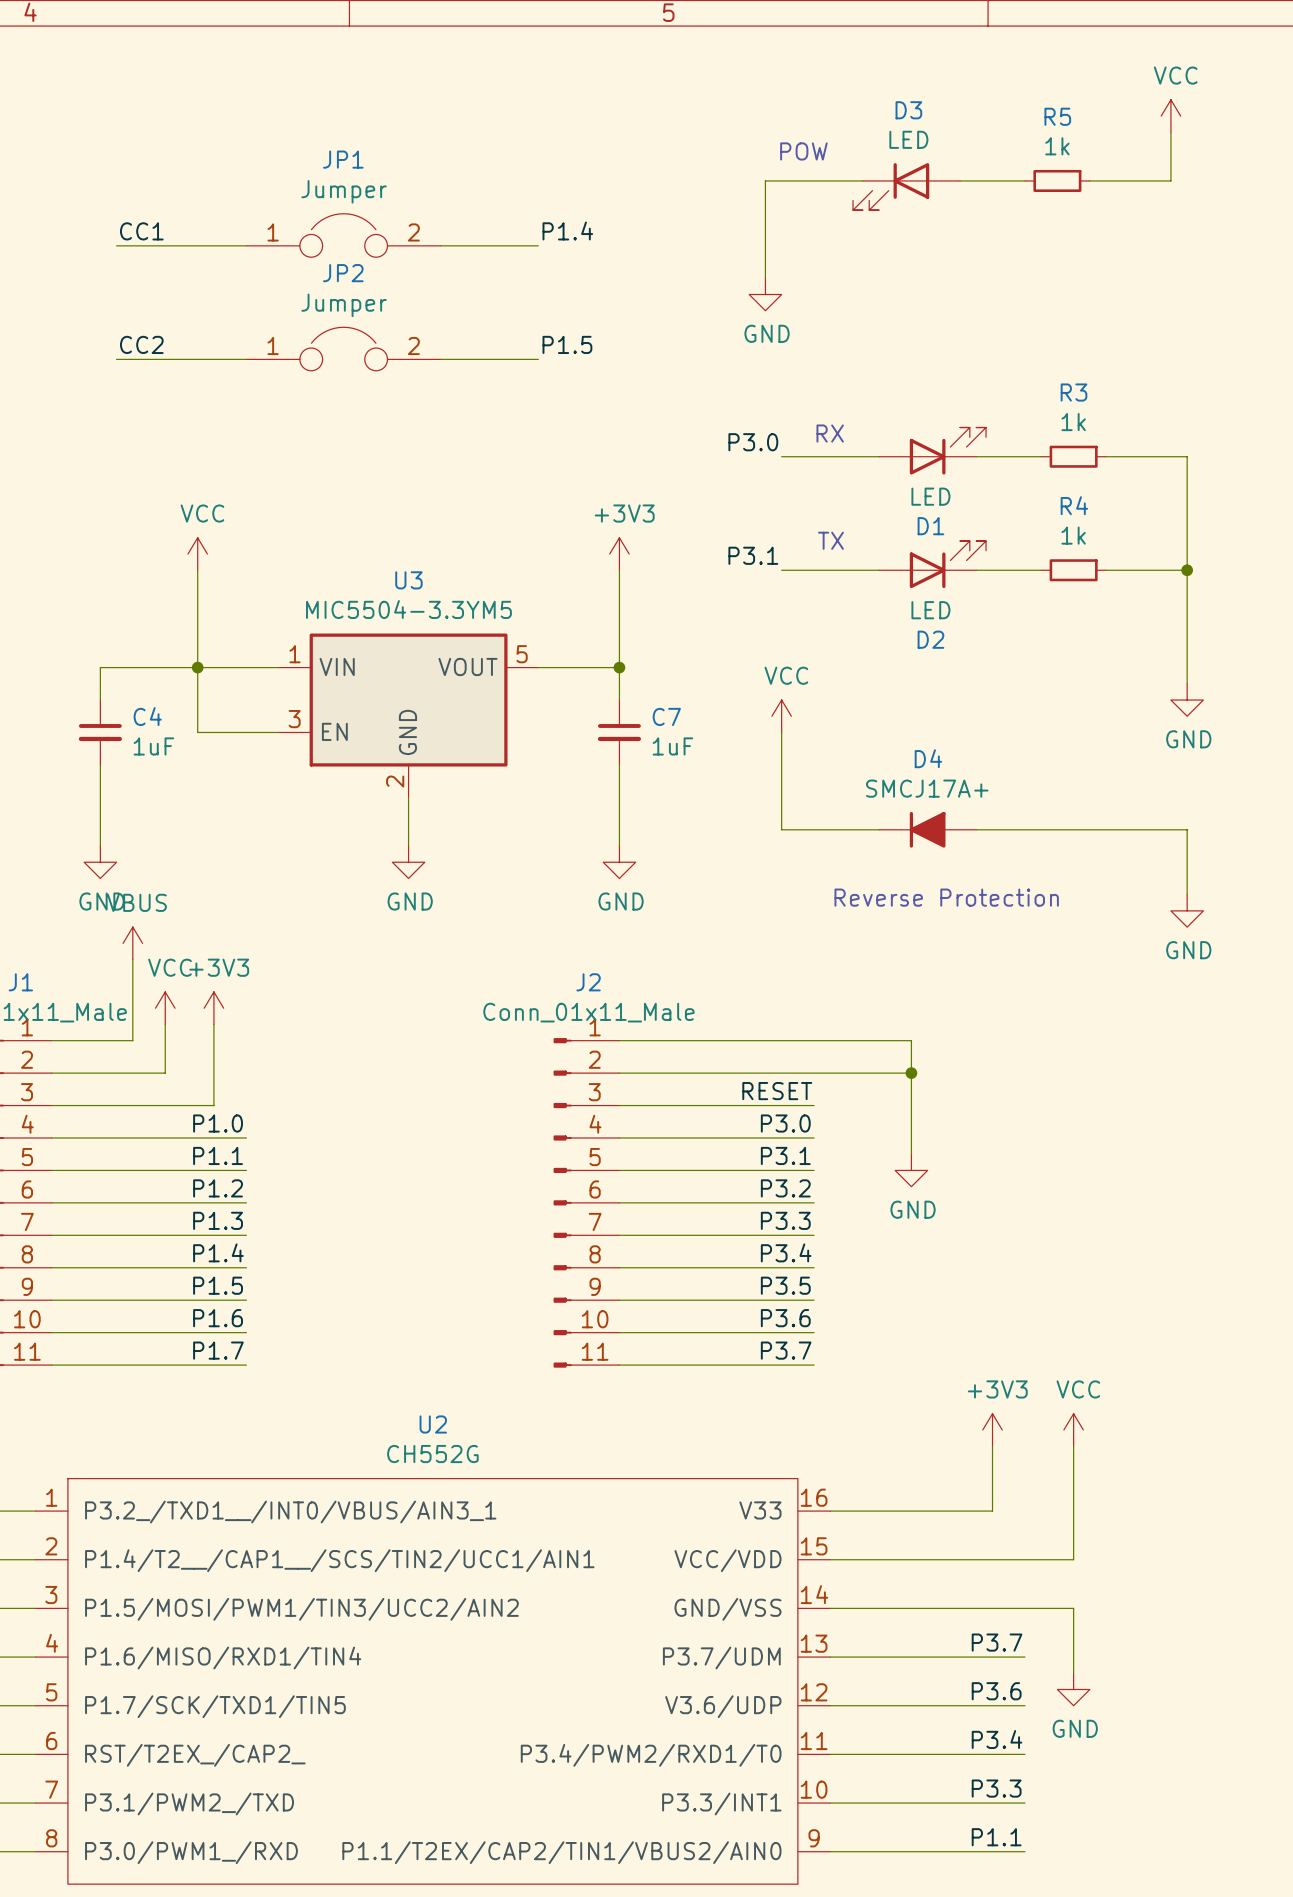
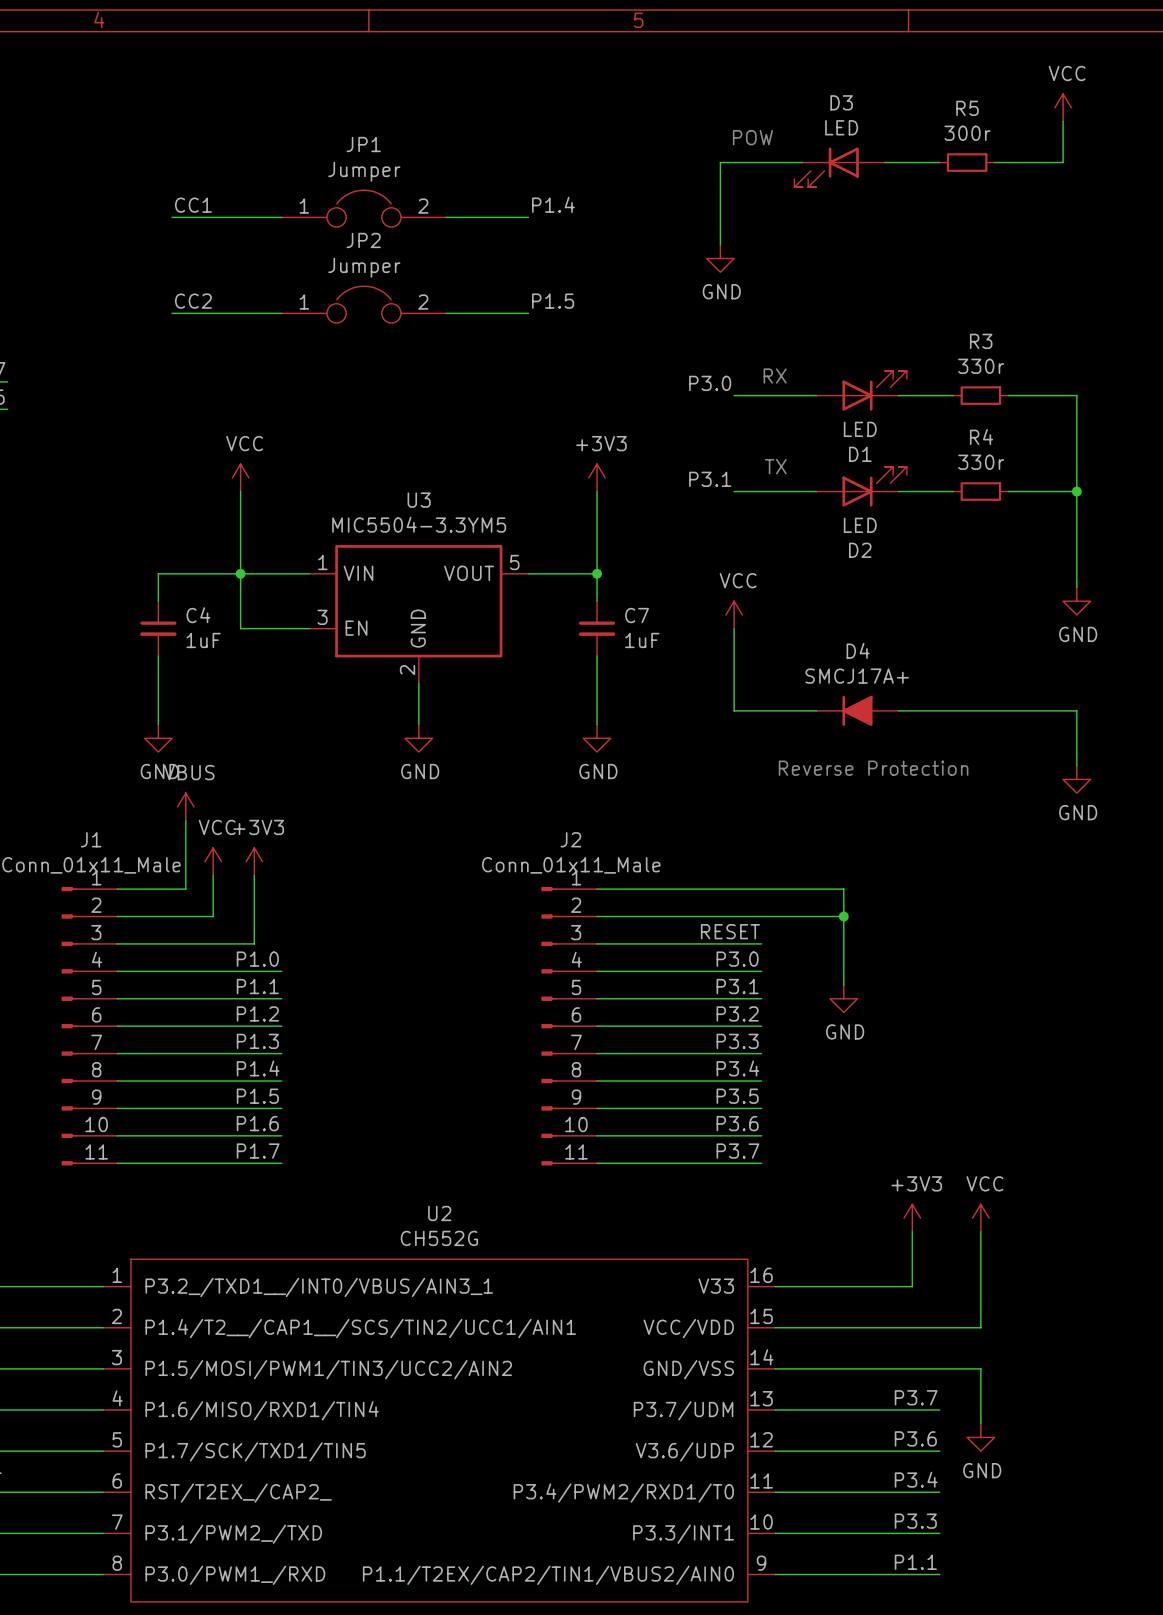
R5 value: 1k (1057, 146) -> 300r (967, 133)
R3 value: 1k (1073, 422) -> 330r (981, 366)
R4 value: 1k (1073, 535) -> 330r (981, 462)

